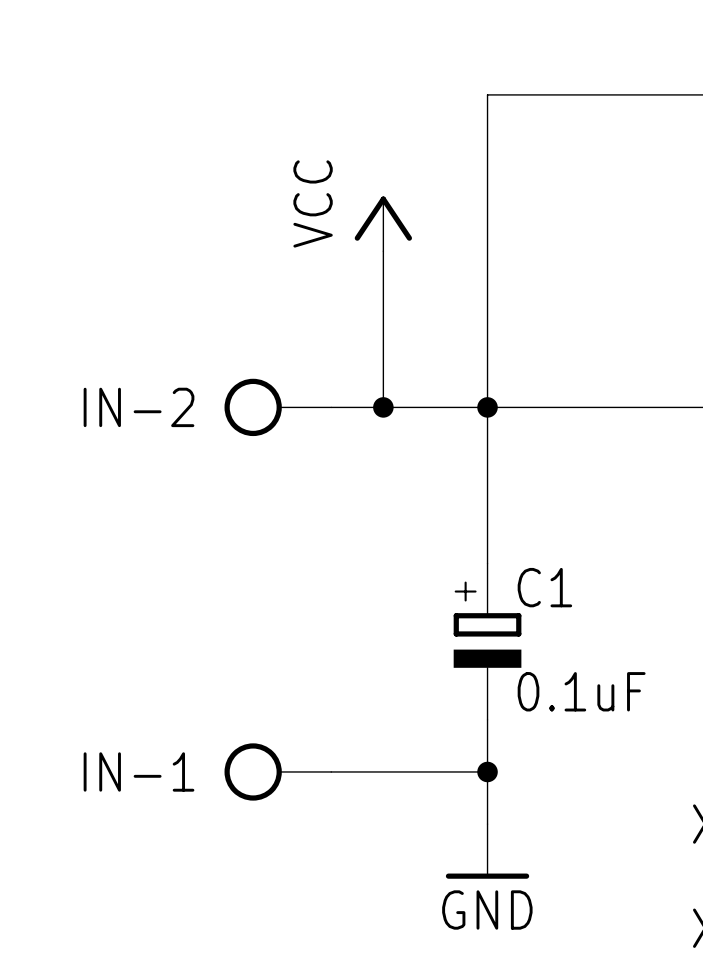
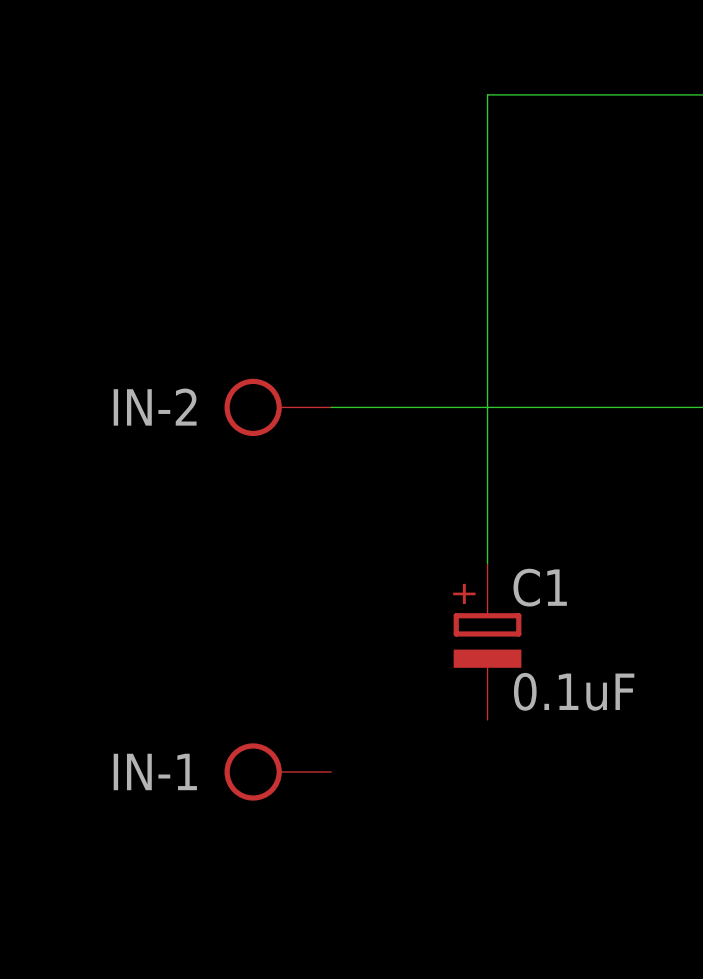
power symbol: VCC (383, 223) -> none
wire: (383, 251) (383, 407) -> none
junction: (383, 407) -> none
junction: (487, 407) -> none
wire: (487, 719) (487, 824) -> none
wire: (331, 771) (487, 771) -> none
junction: (487, 771) -> none
power symbol: GND (487, 851) -> none

